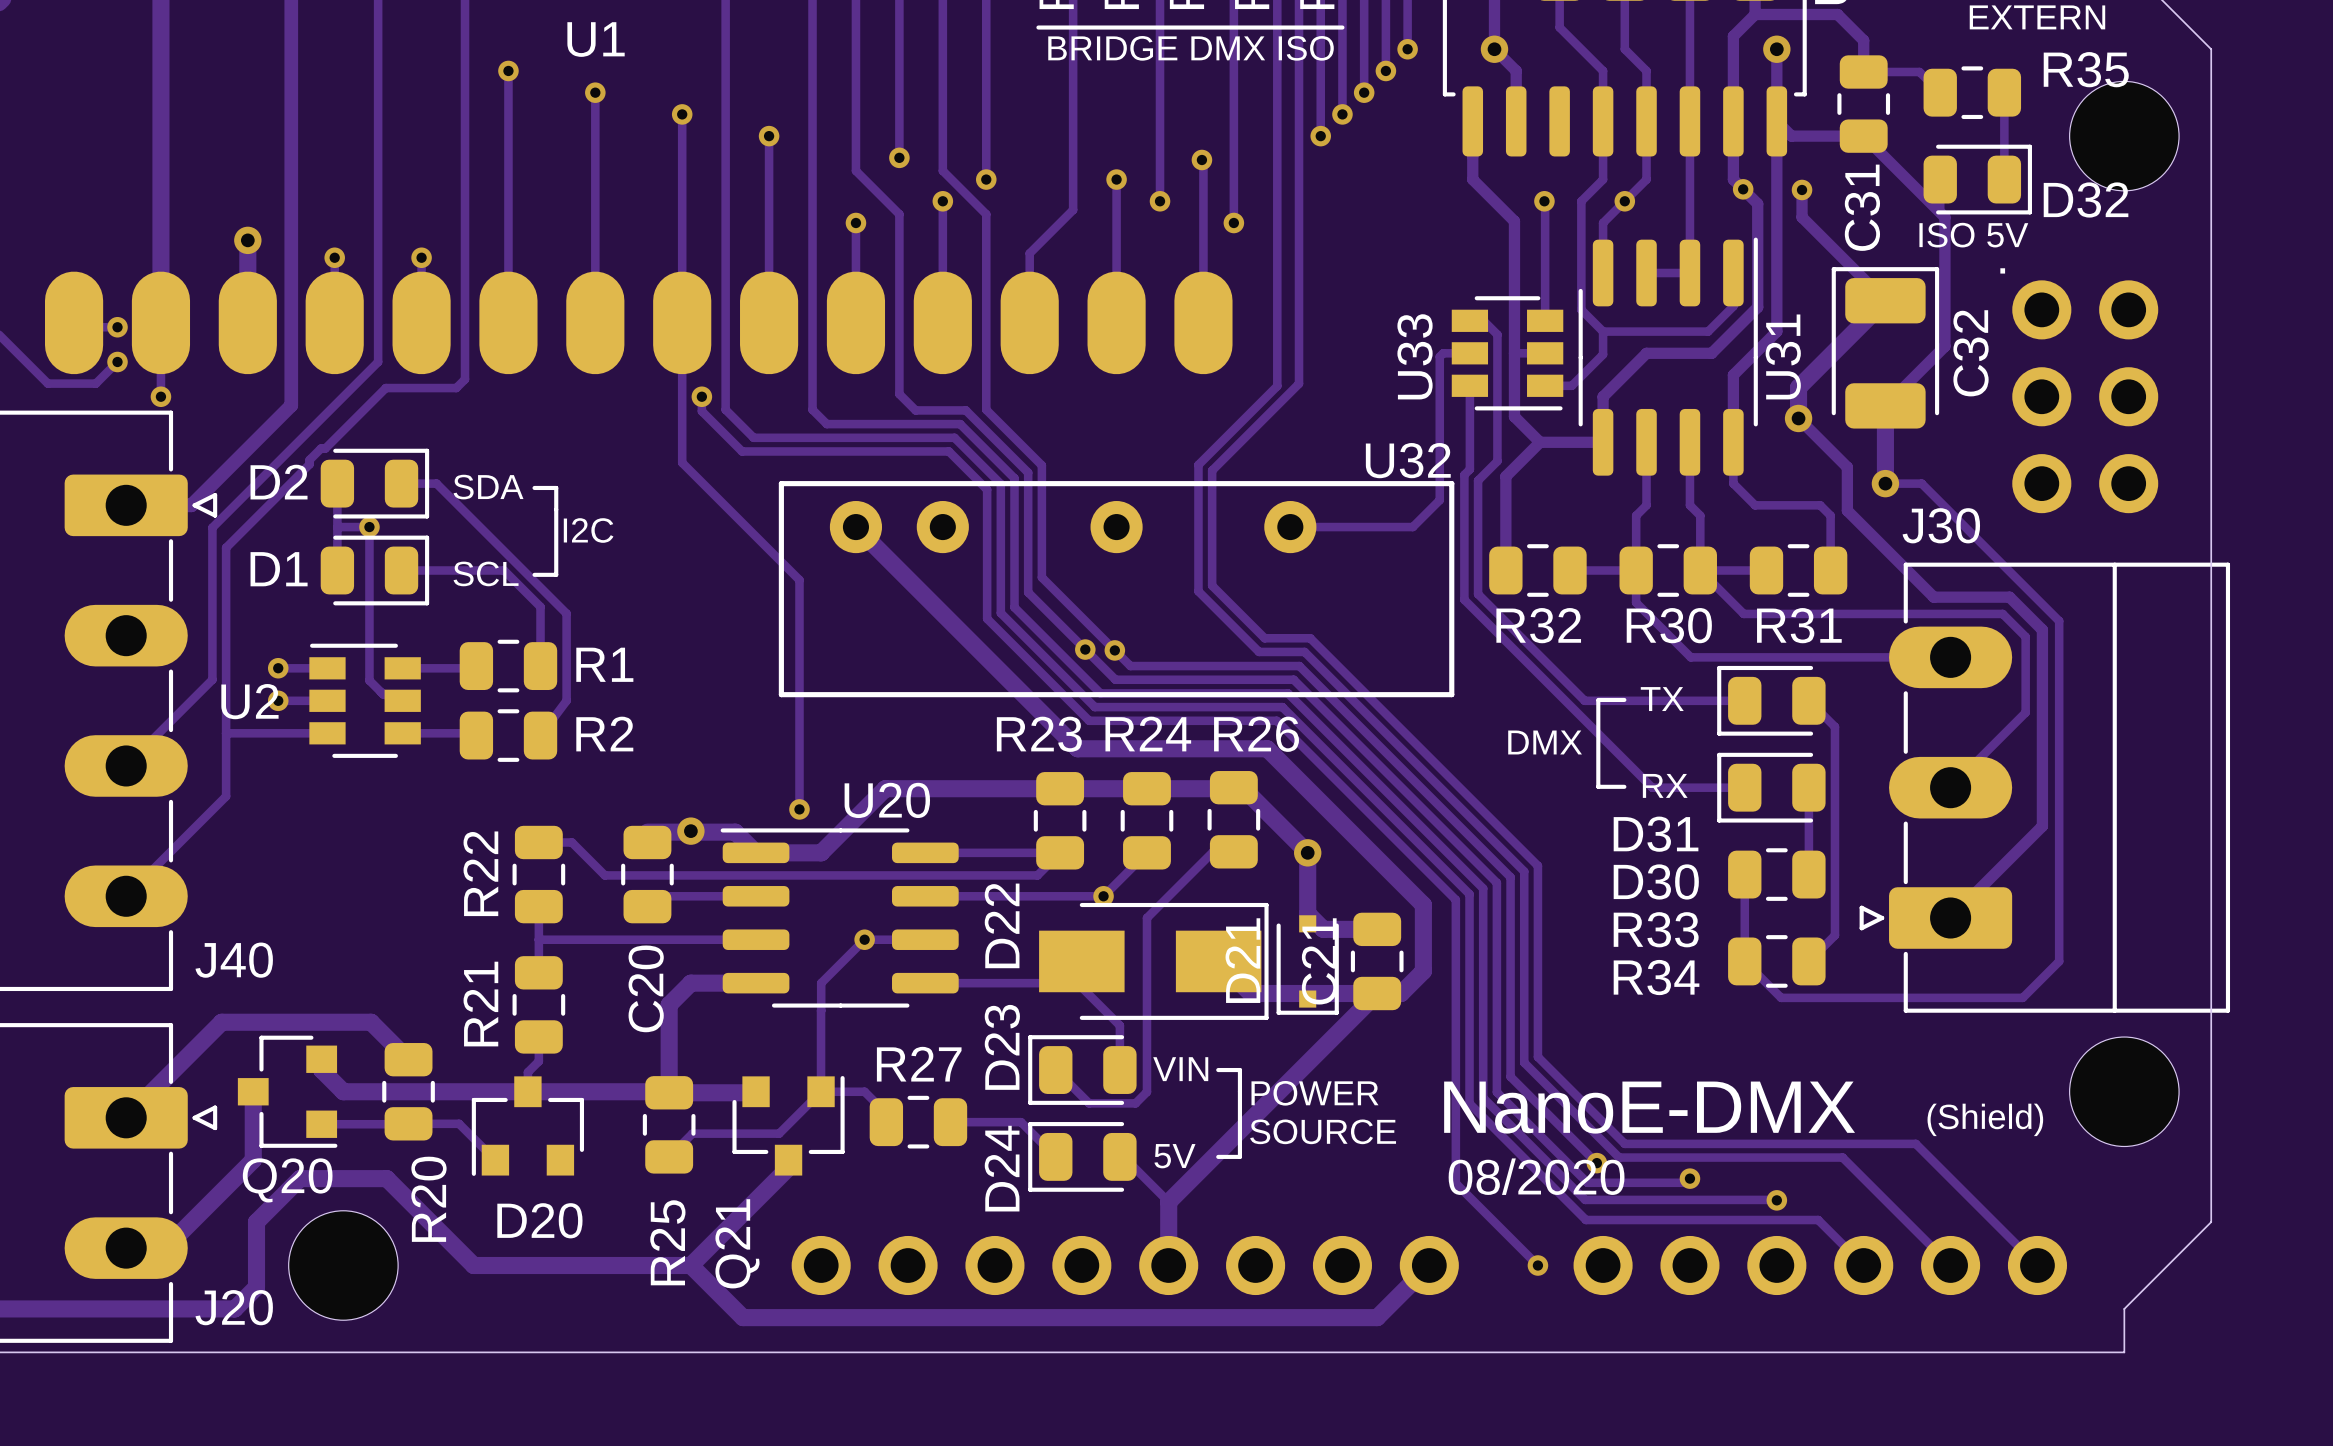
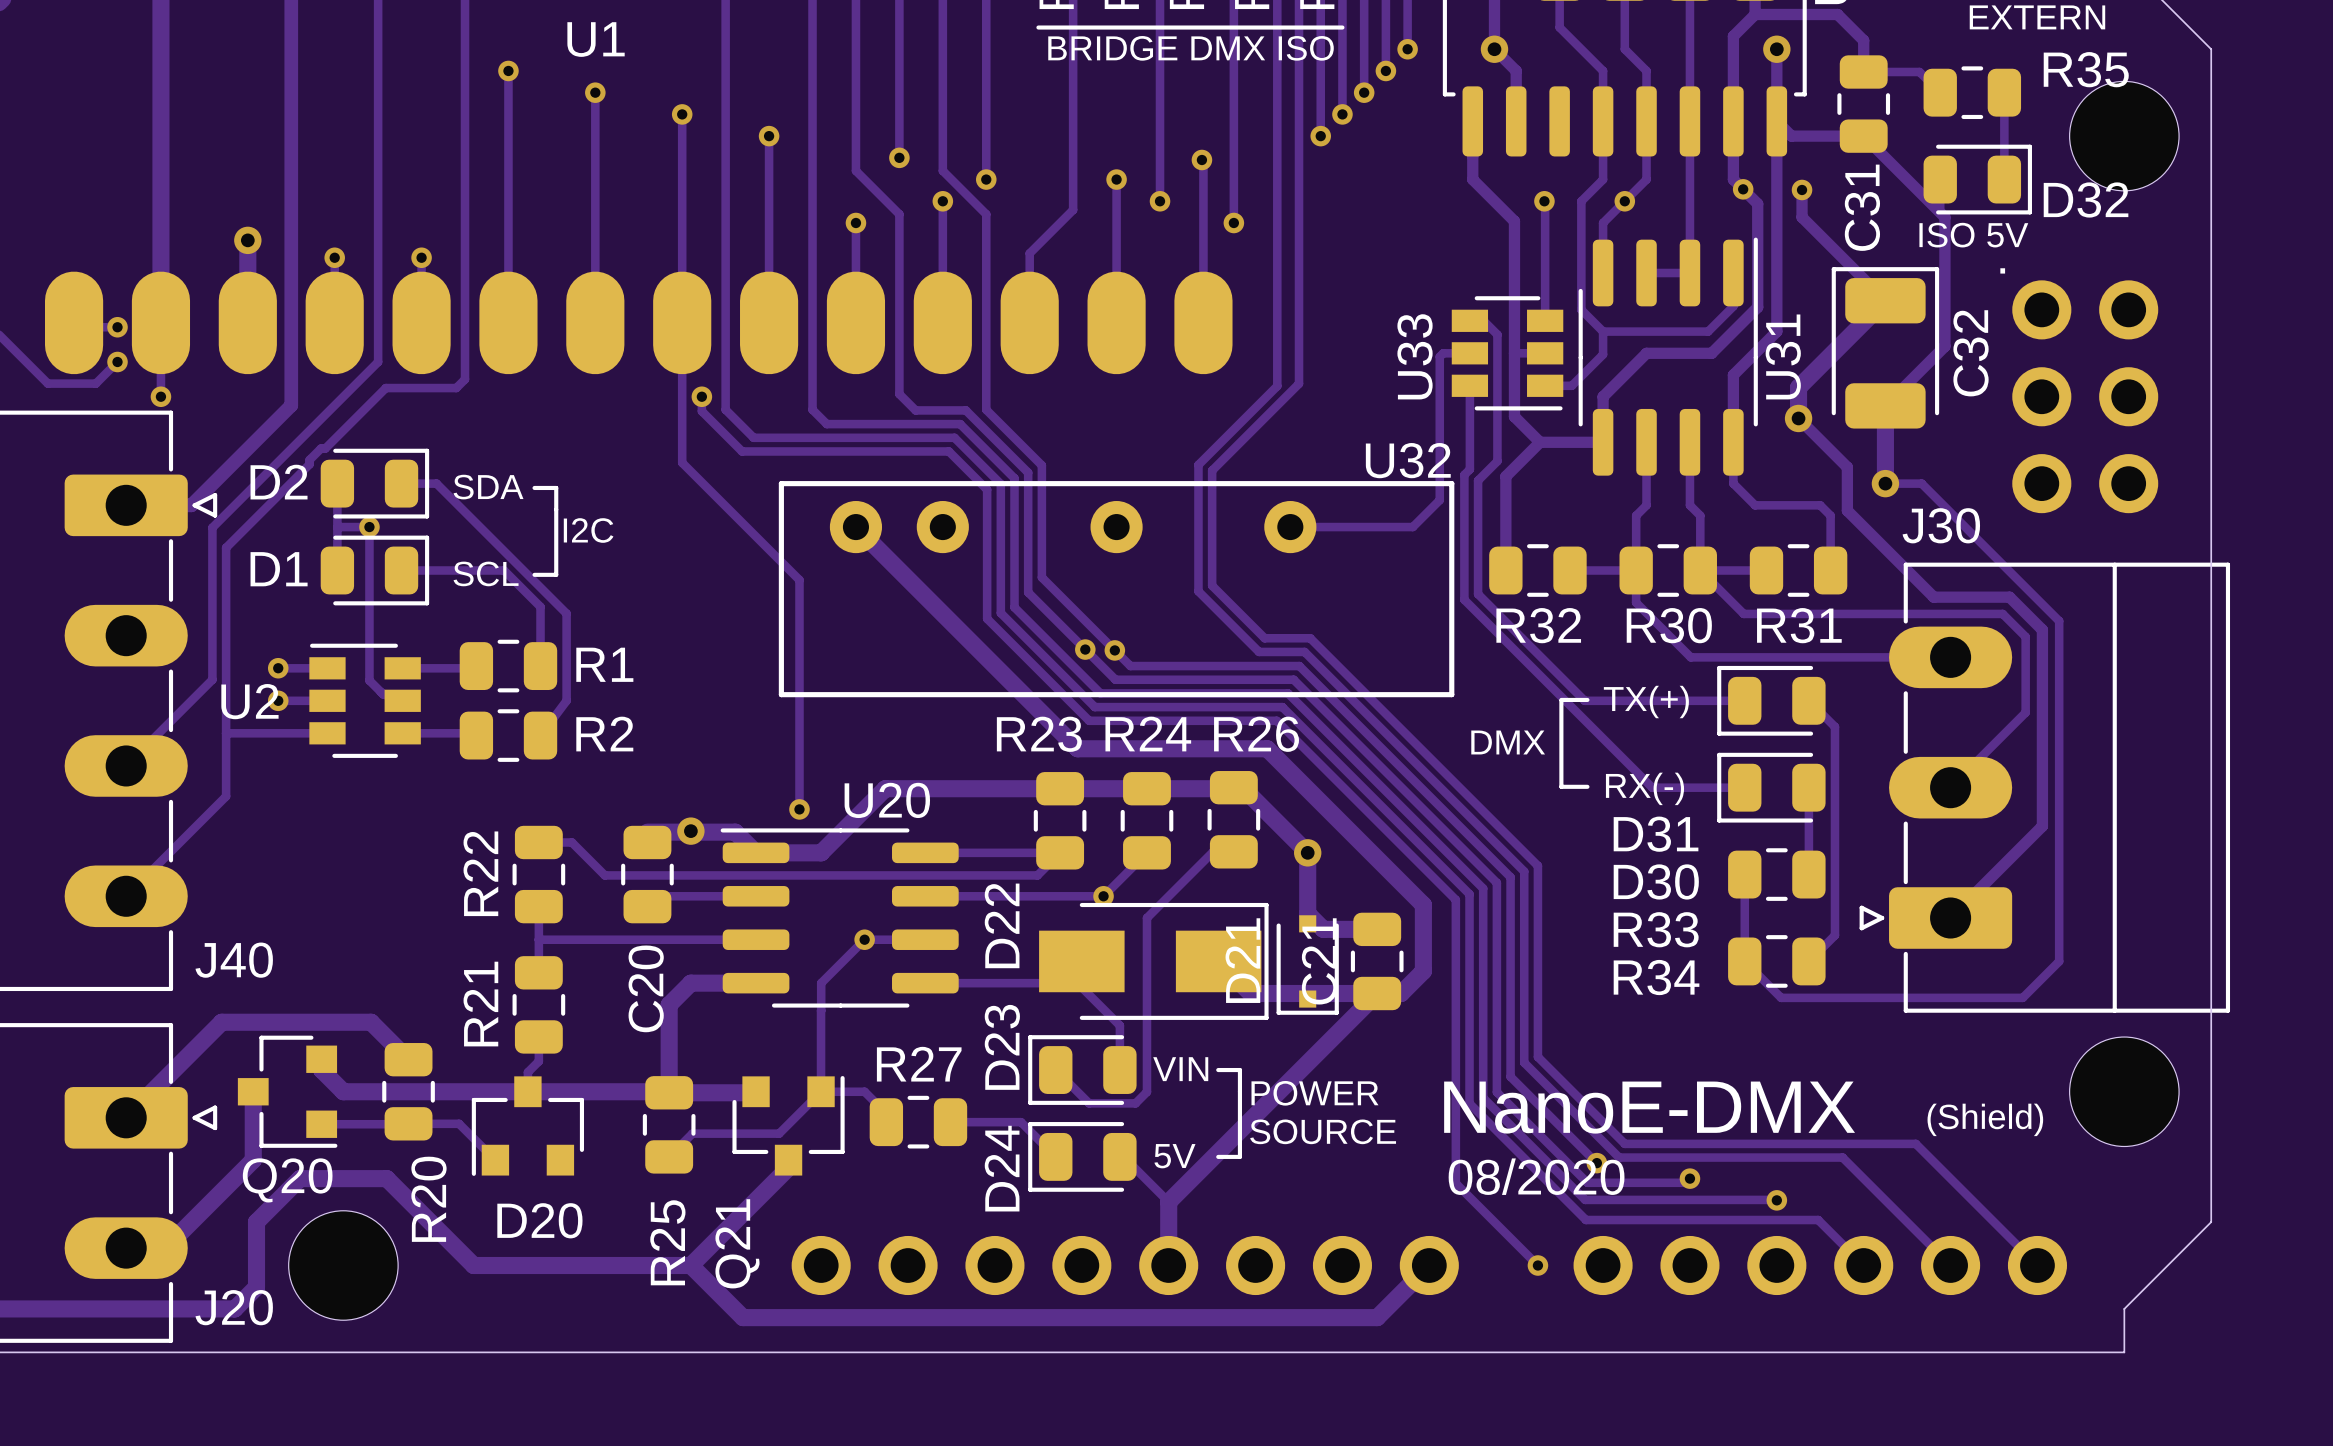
line: (1598, 699) (1624, 699) -> (1561, 699) (1587, 699)
text: TX (1662, 699) -> none
line: (1598, 700) (1598, 786) (1624, 786) -> (1561, 700) (1561, 786) (1587, 786)
text: none -> TX(+) (1646, 702)
text position: DMX (1545, 742) -> DMX (1508, 742)
text: RX (1665, 785) -> none
text: none -> RX(-) (1644, 788)

